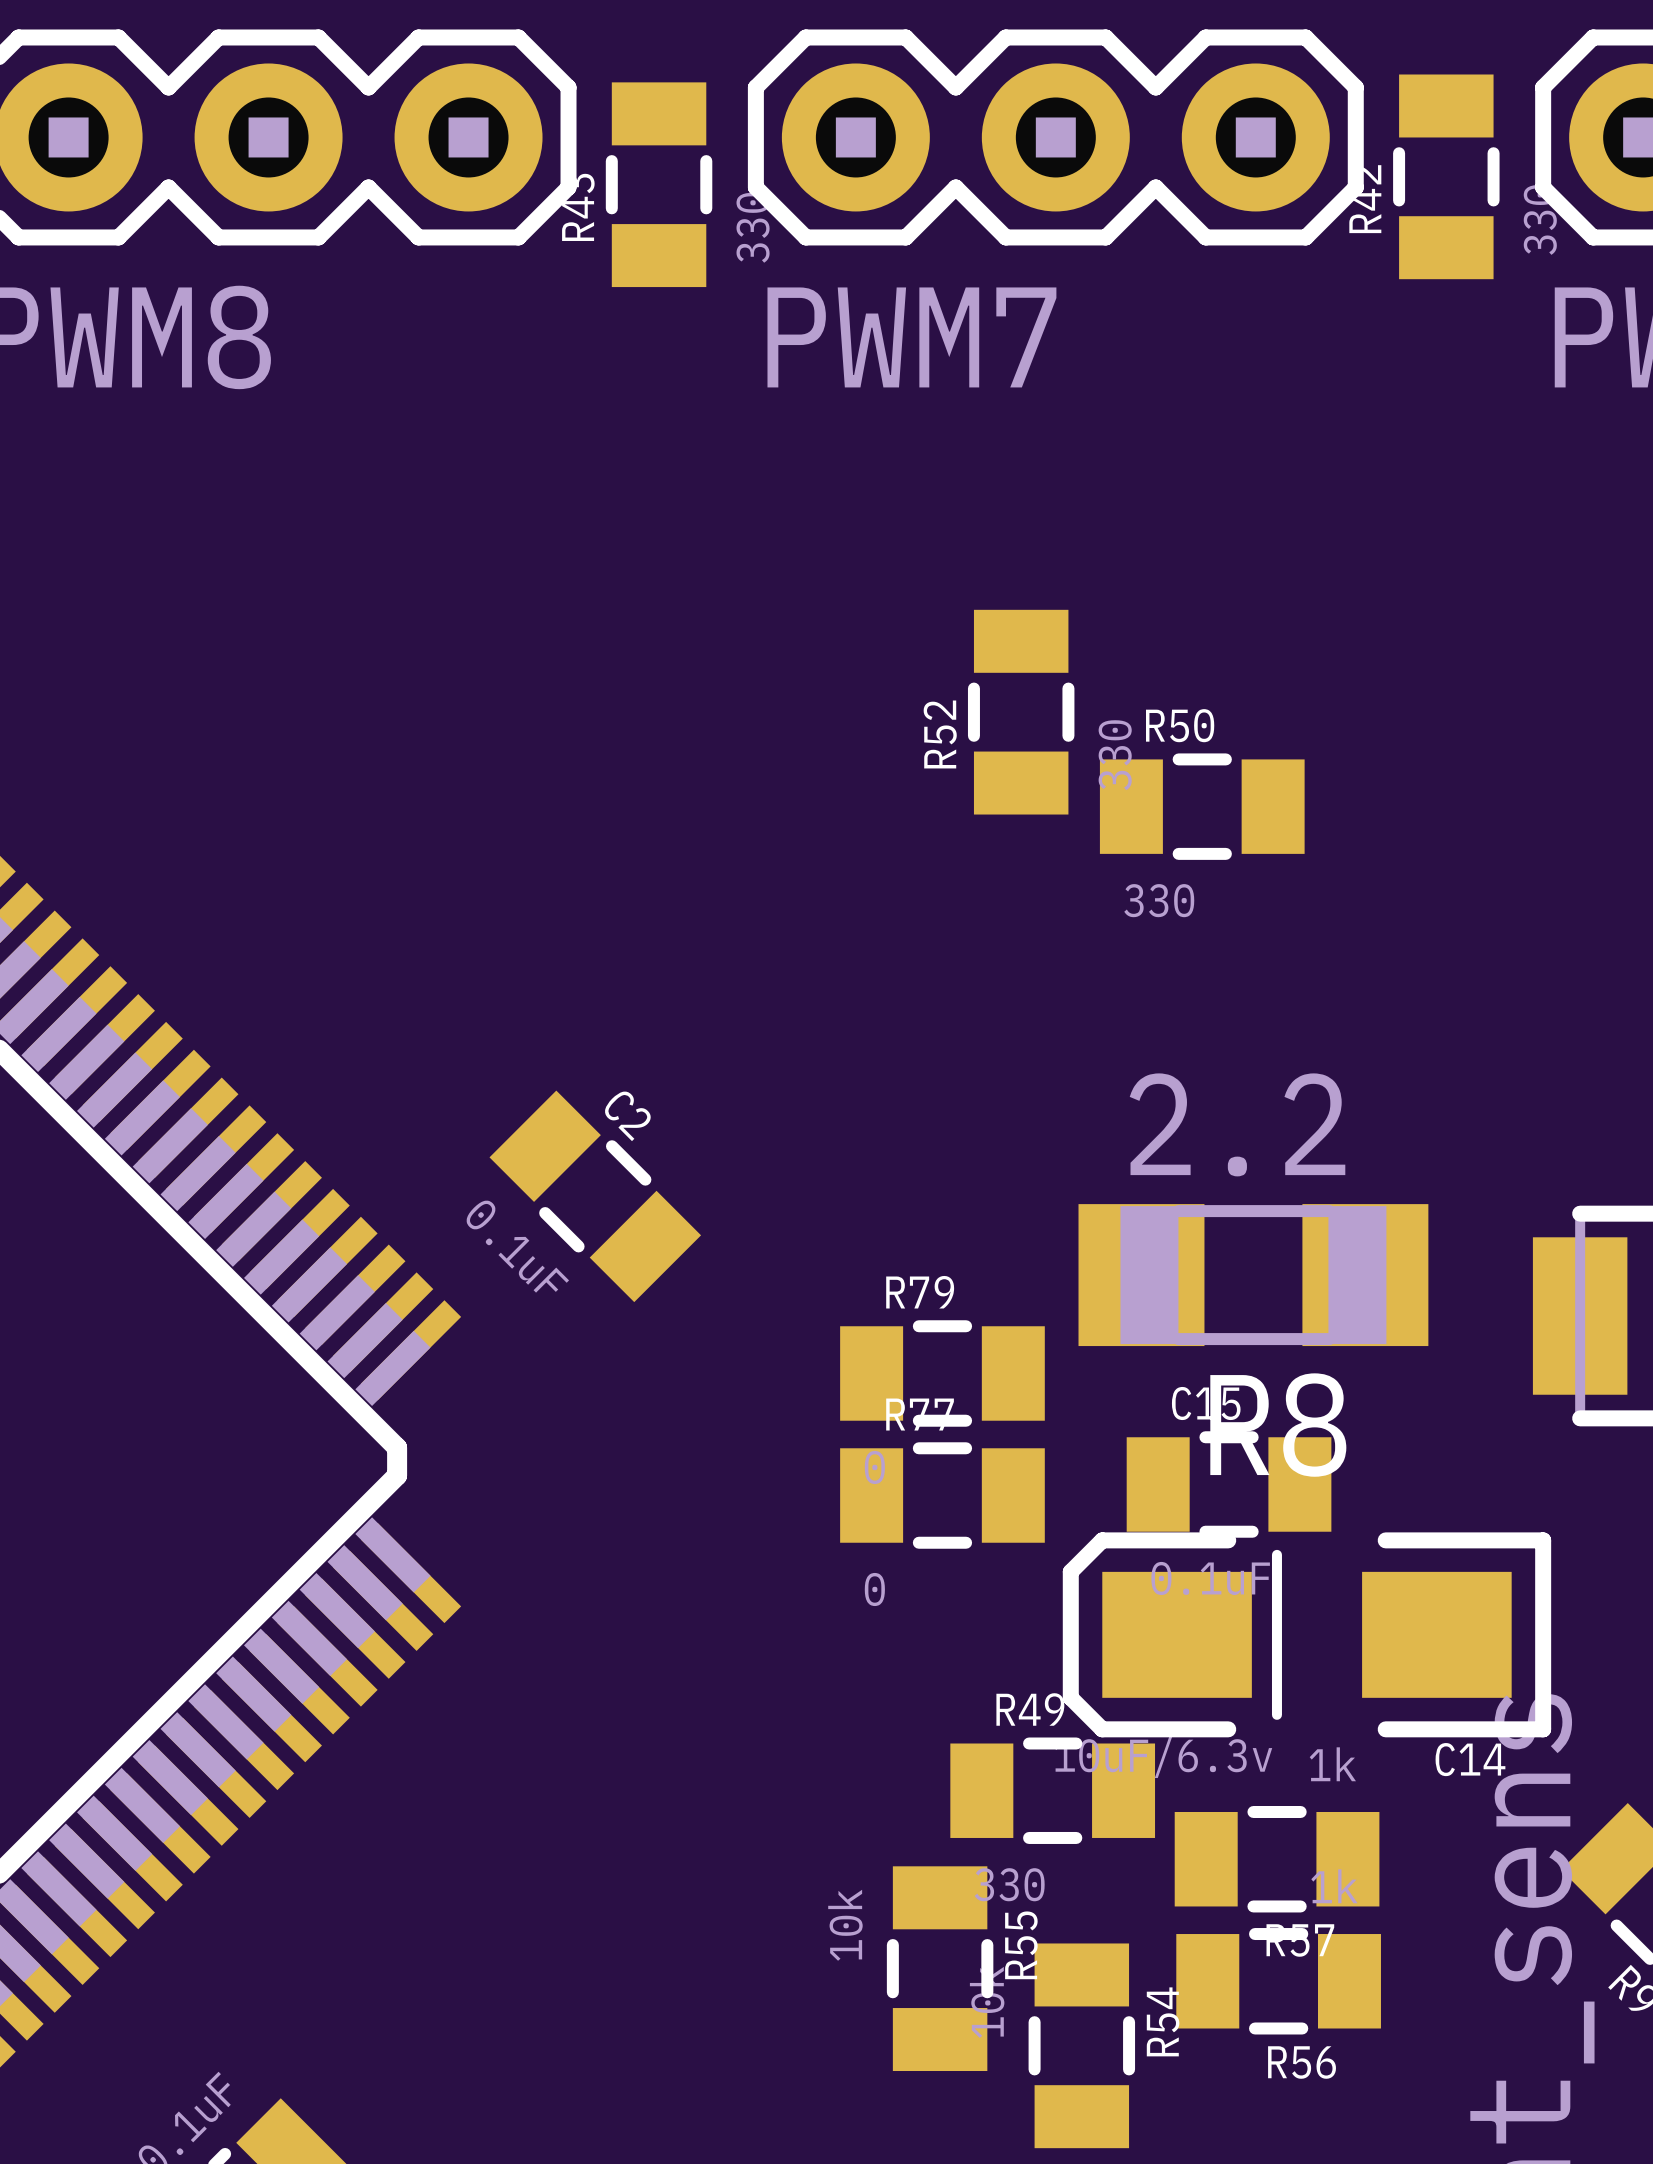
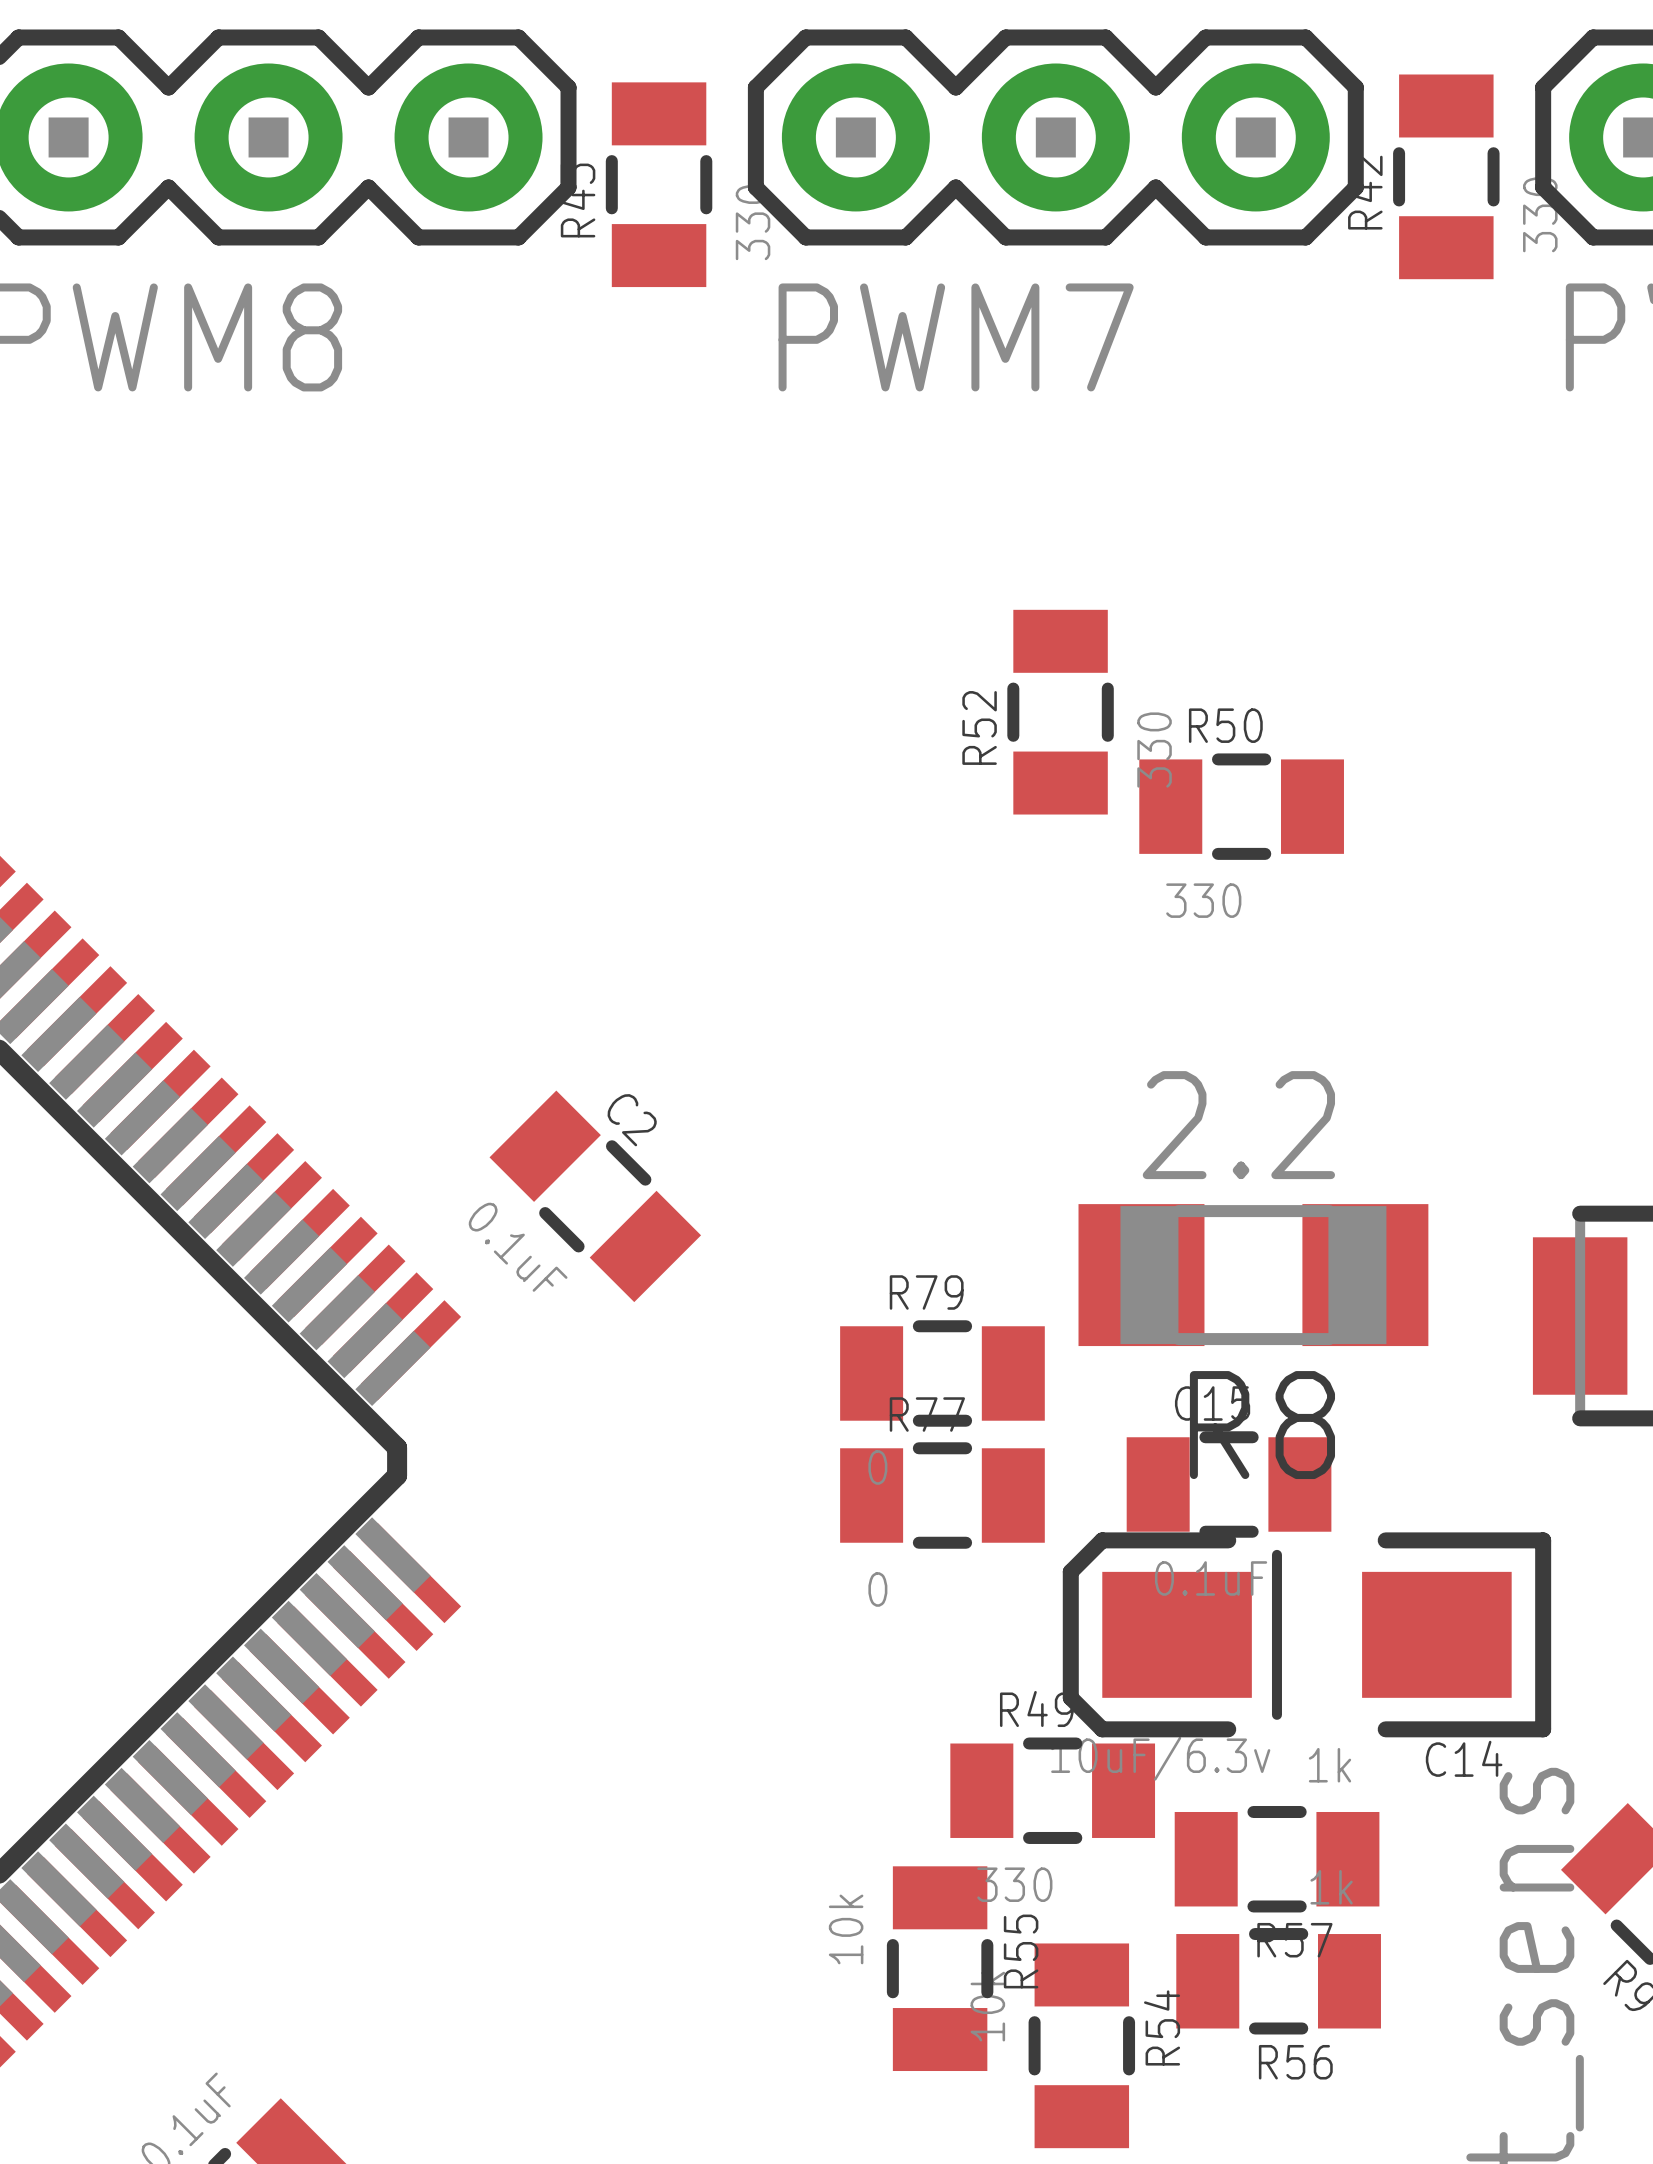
R52 position: (1021, 712) -> (1060, 712)
R50 position: (1202, 806) -> (1241, 806)

